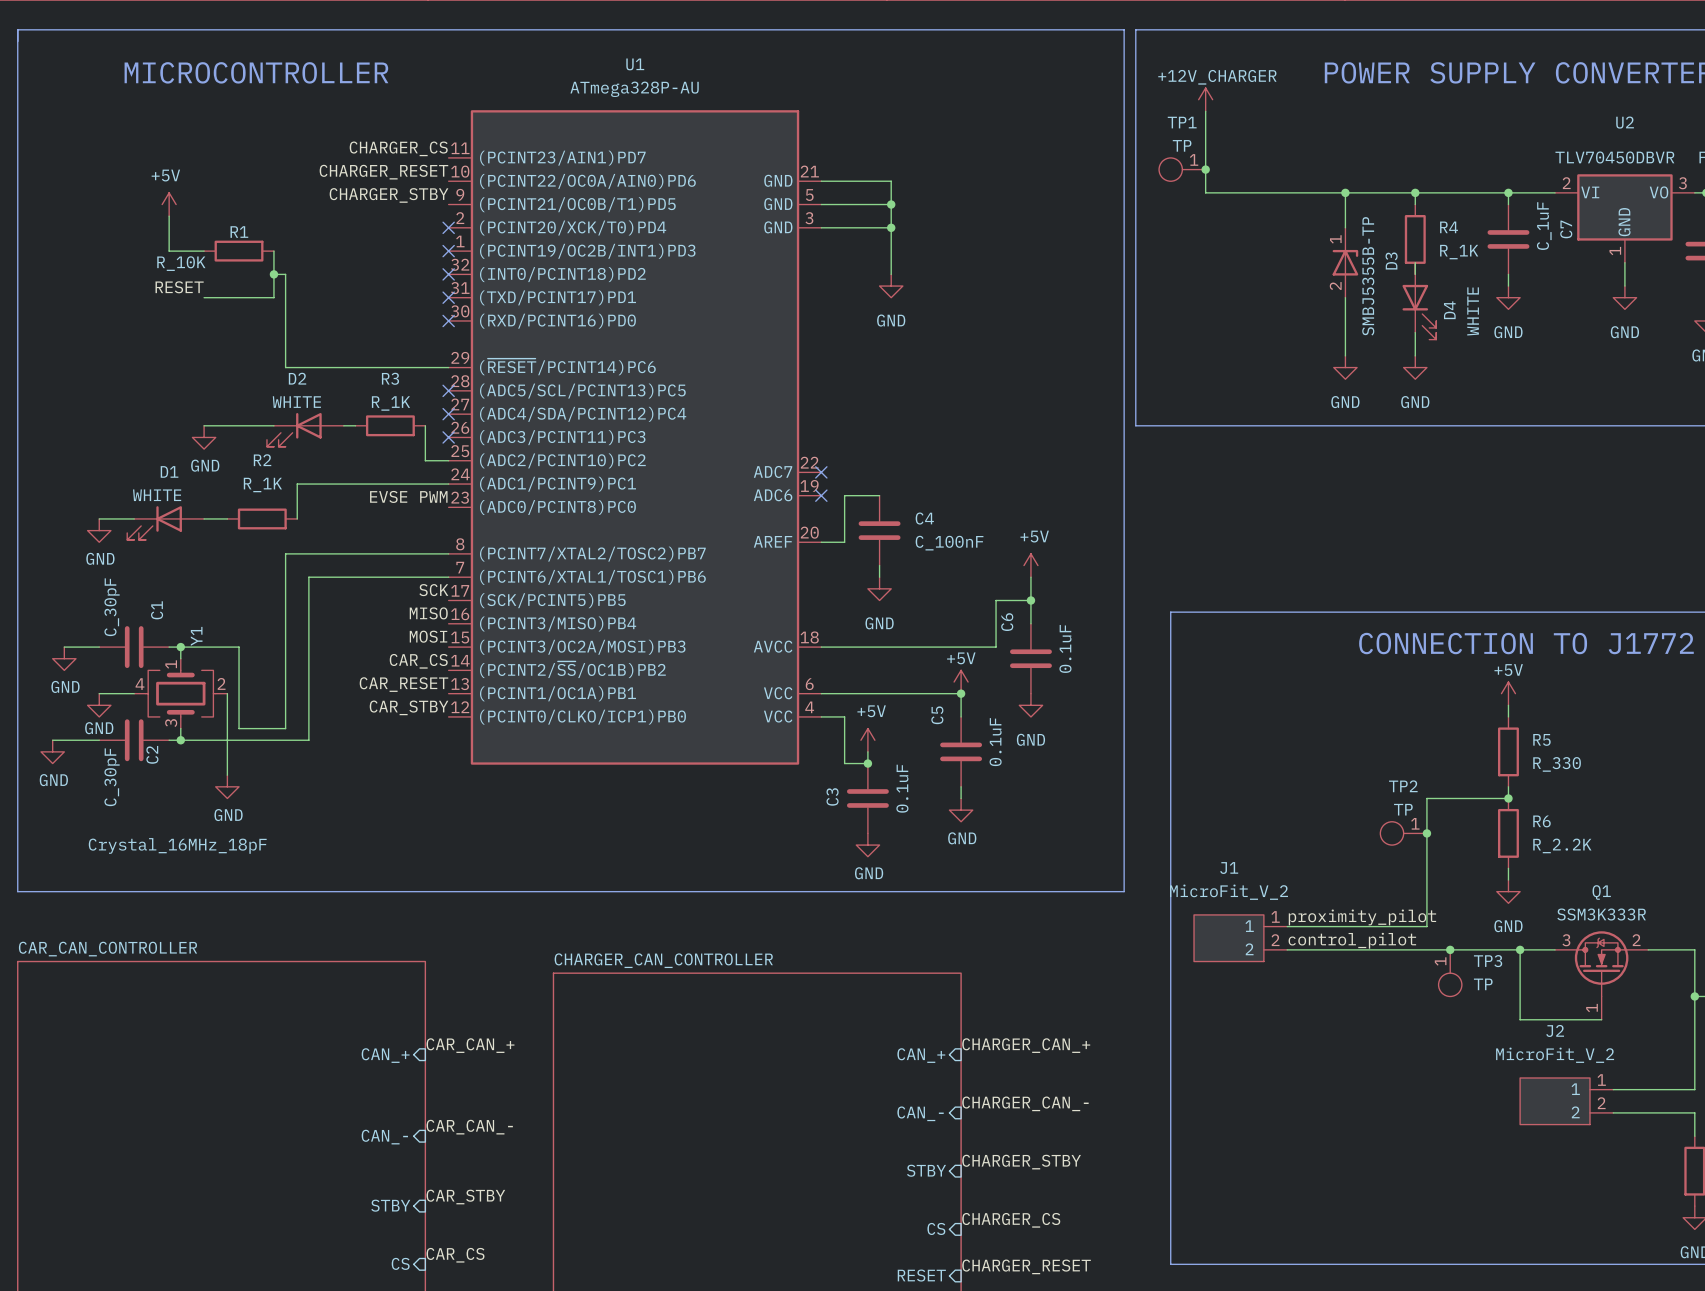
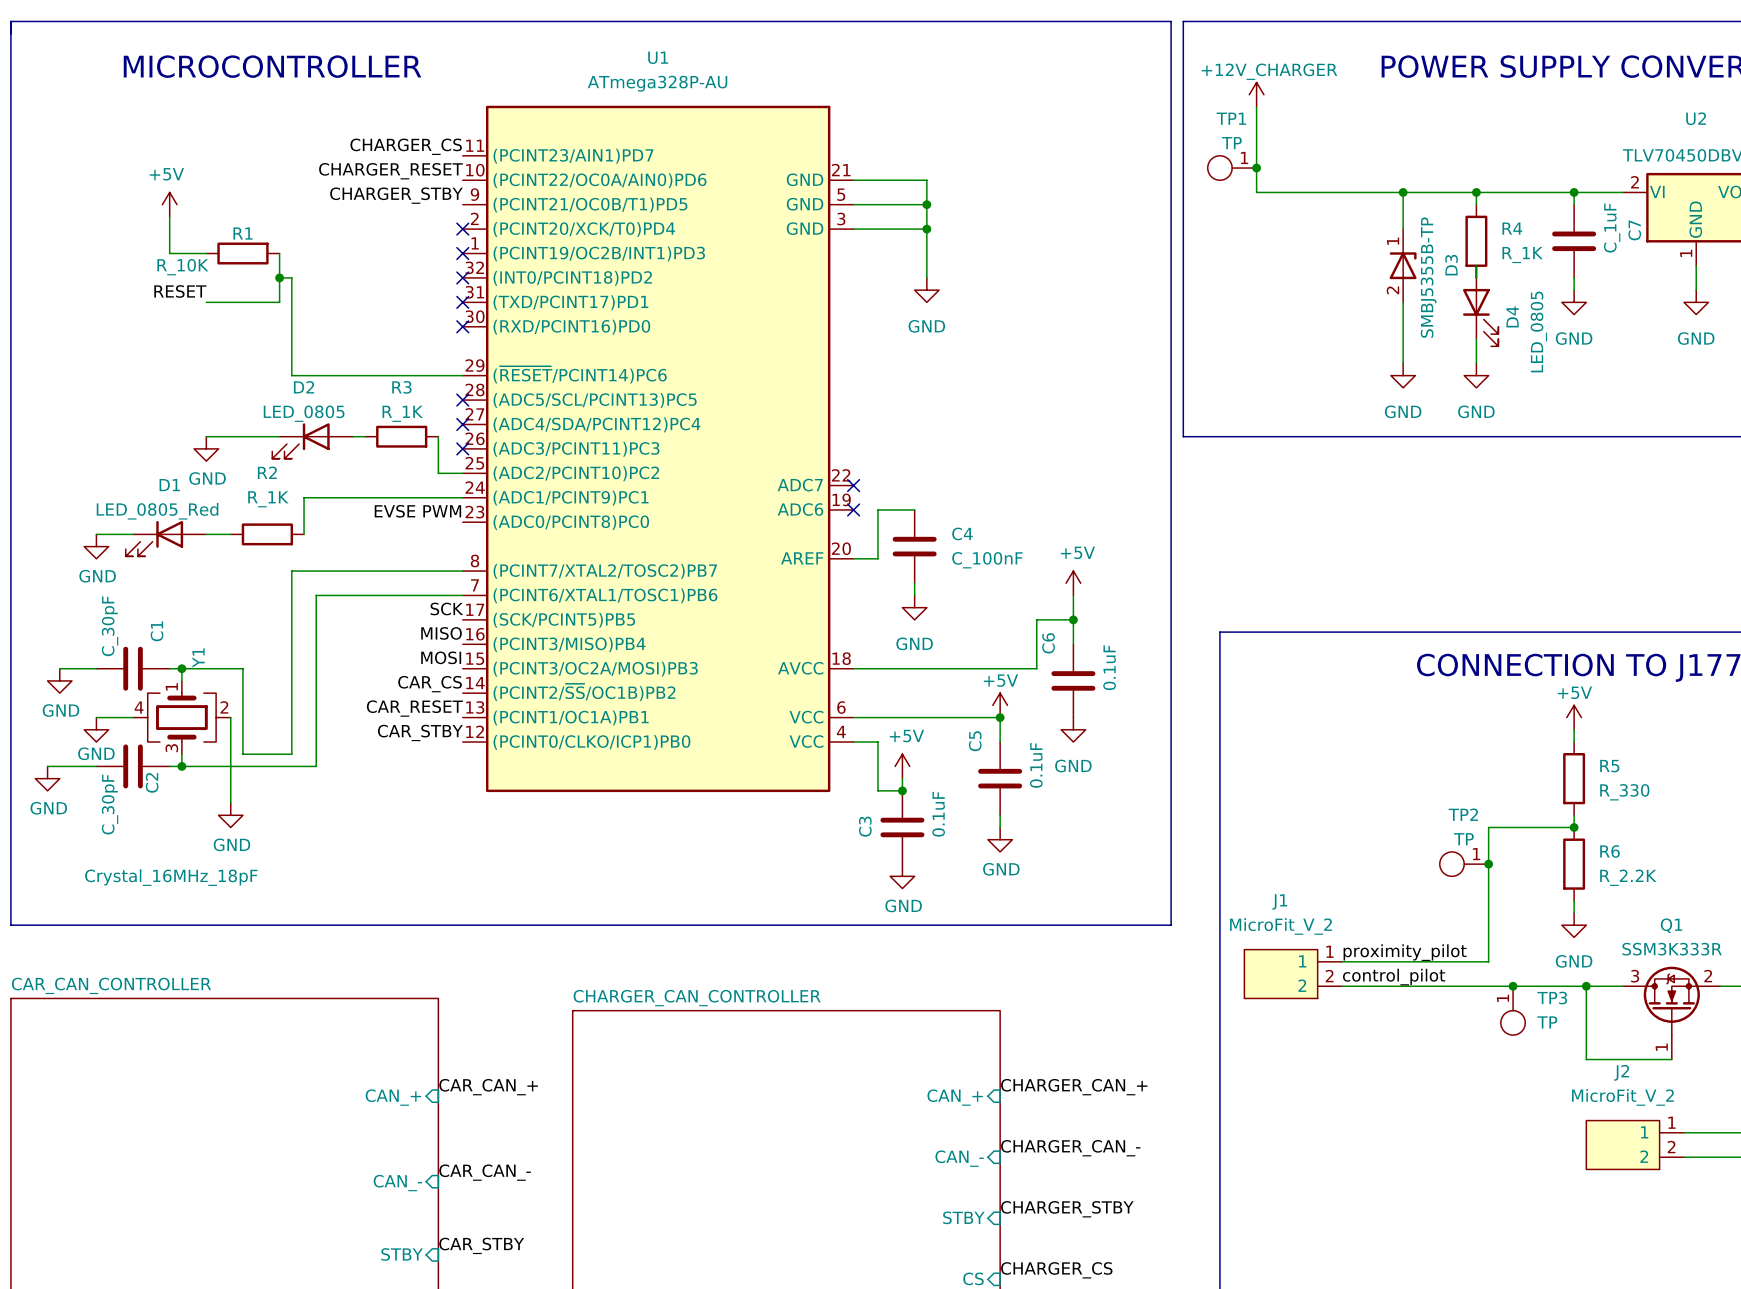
D4 value: WHITE (1473, 311) -> LED_0805 (1538, 331)
D2 value: WHITE (296, 402) -> LED_0805 (304, 413)
D1 value: WHITE (157, 495) -> LED_0805_Red (157, 511)

